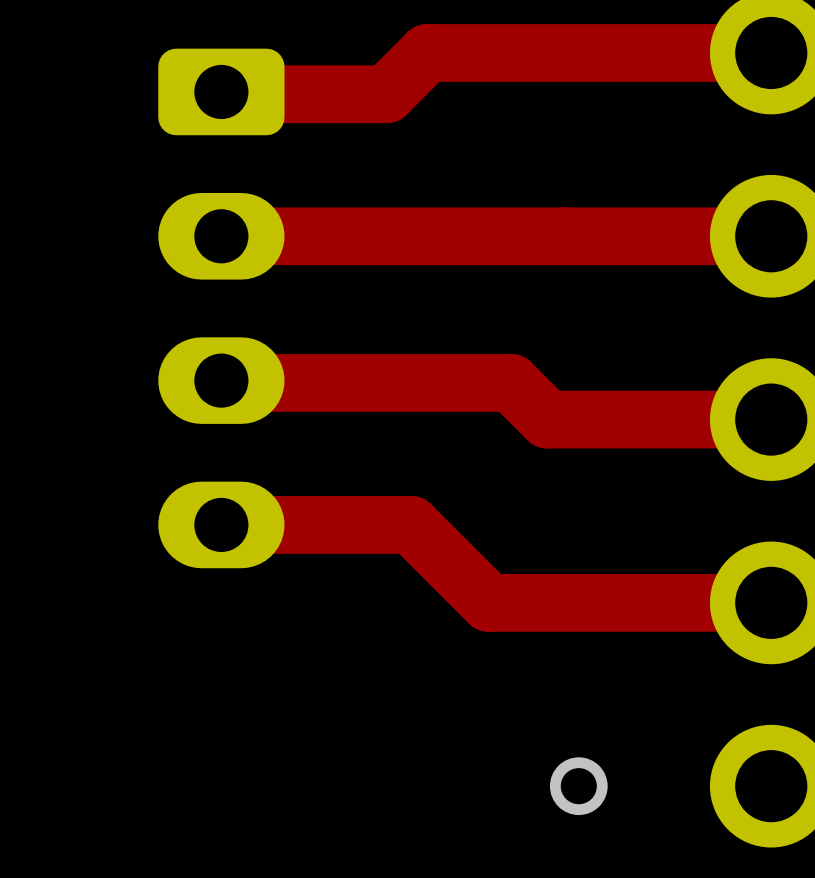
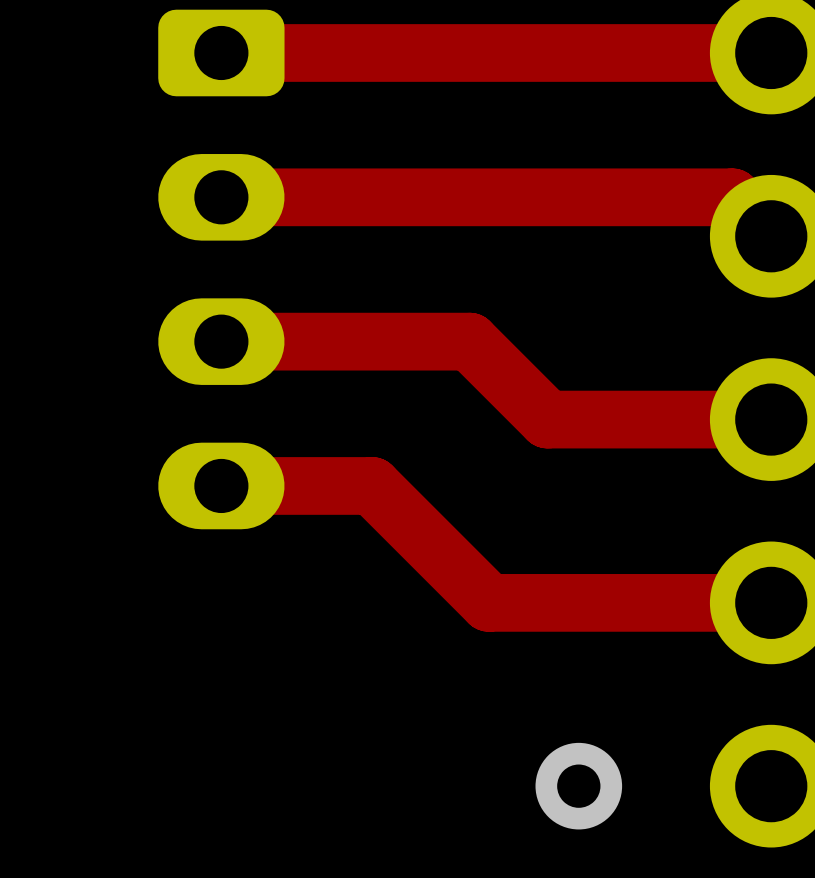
top track: (427, 52) (386, 94) (223, 94) (221, 91) -> (427, 52) (221, 52)
top track: (771, 236) (221, 236) -> (771, 236) (732, 197) (221, 197)
part position: (221, 308) -> (221, 269)
top track: (221, 380) (223, 382) (510, 382) -> (221, 341) (469, 341) (510, 382)
top track: (411, 524) (221, 524) -> (411, 524) (372, 485) (221, 485)
via size: [549, 757, 608, 816] -> [535, 742, 623, 830]

